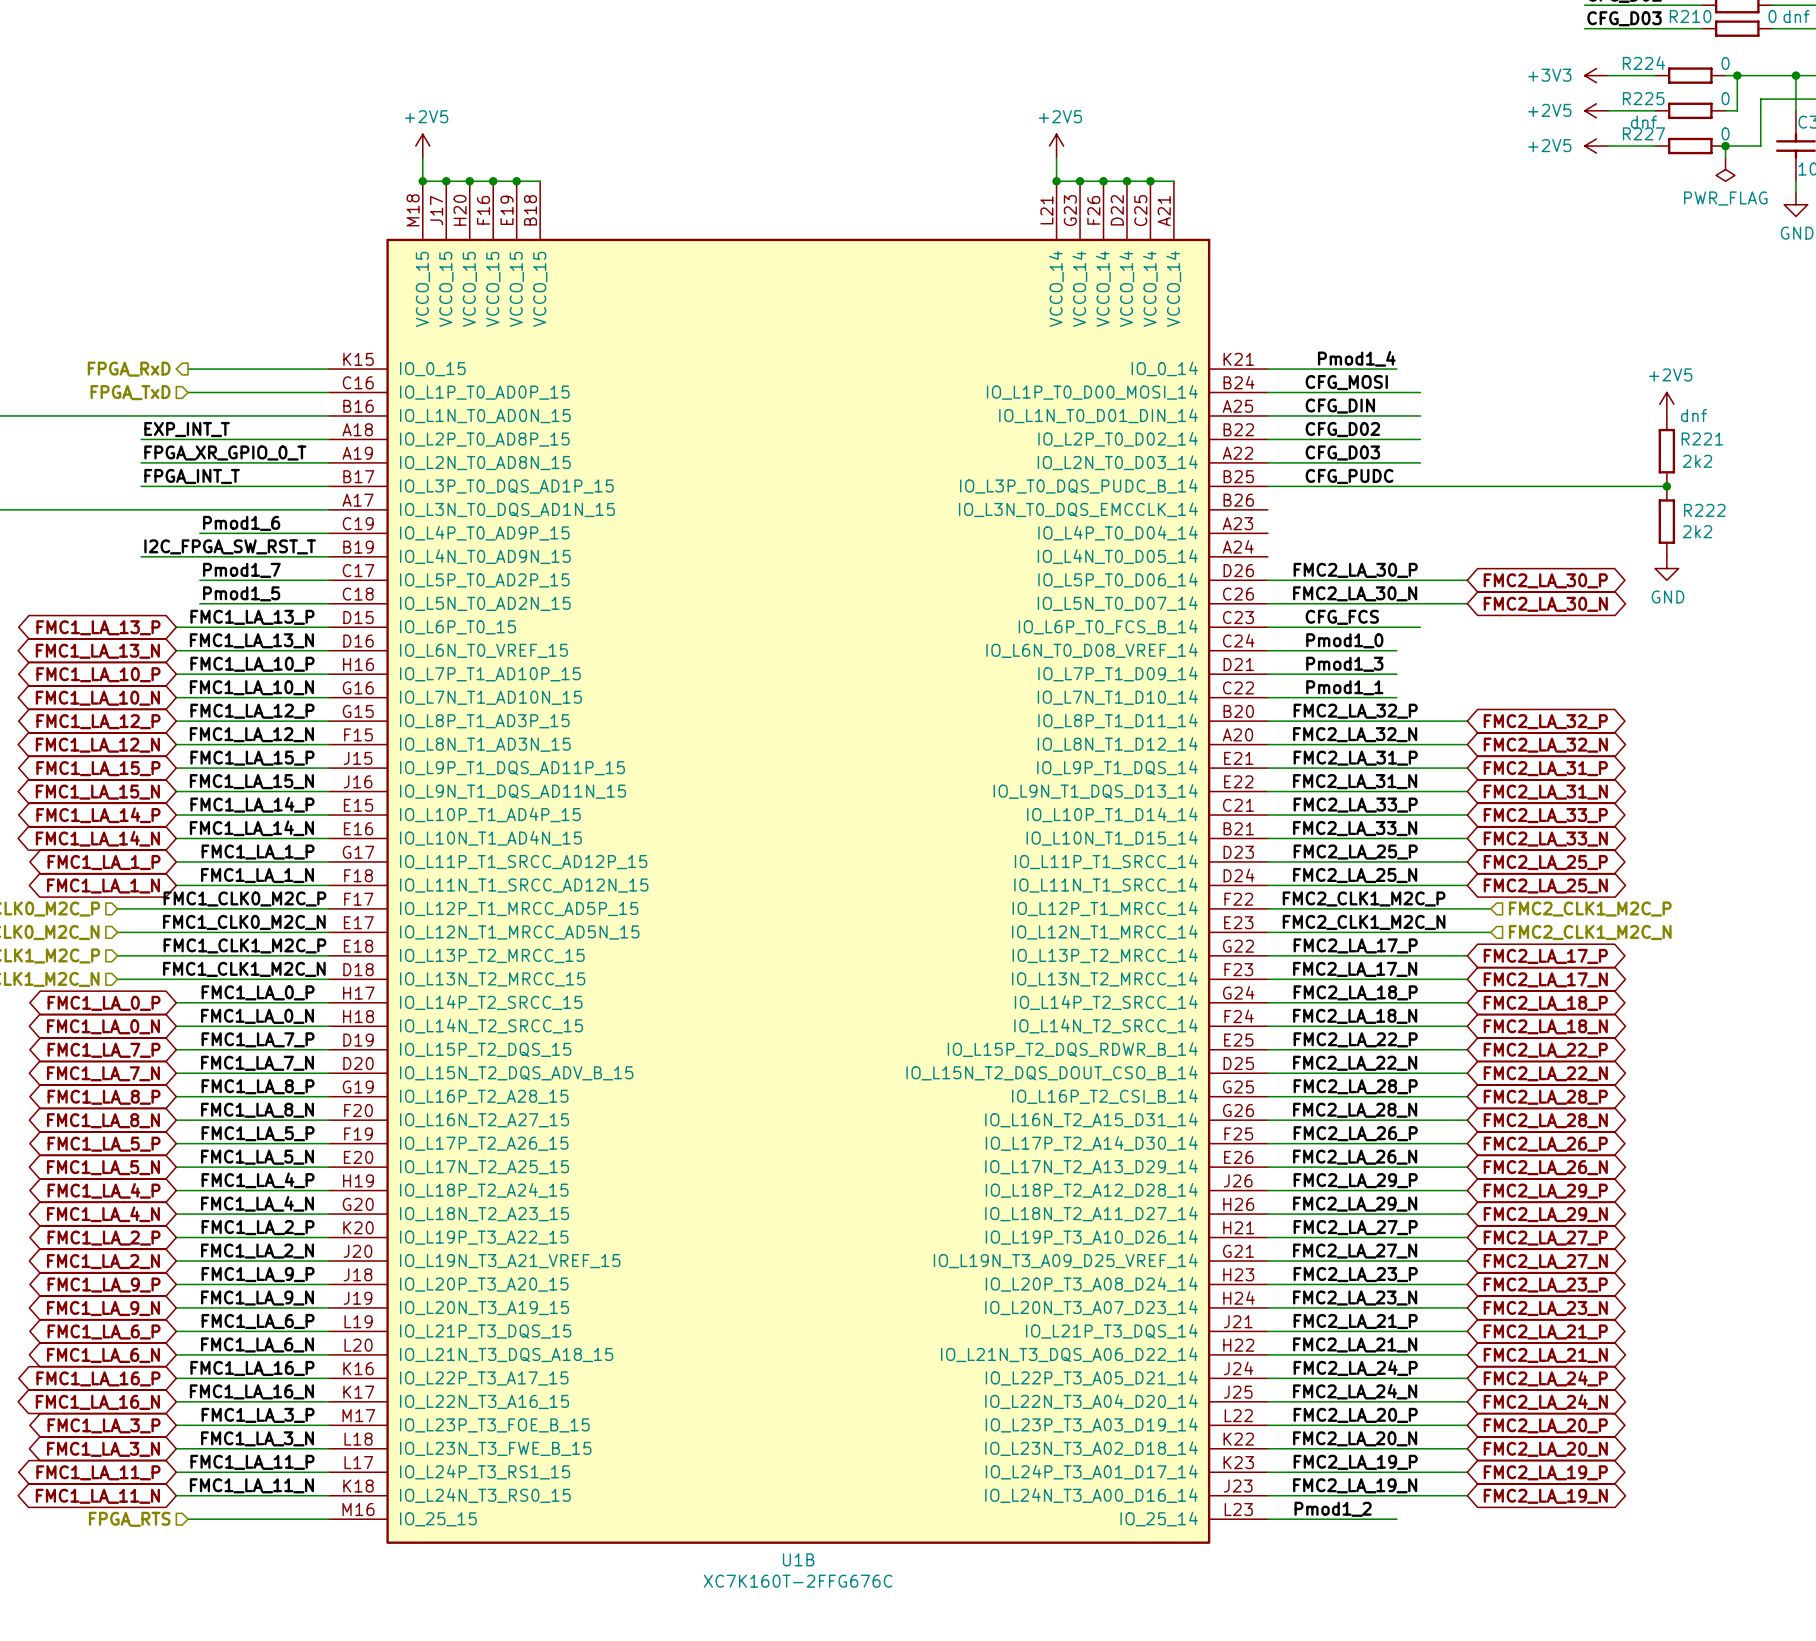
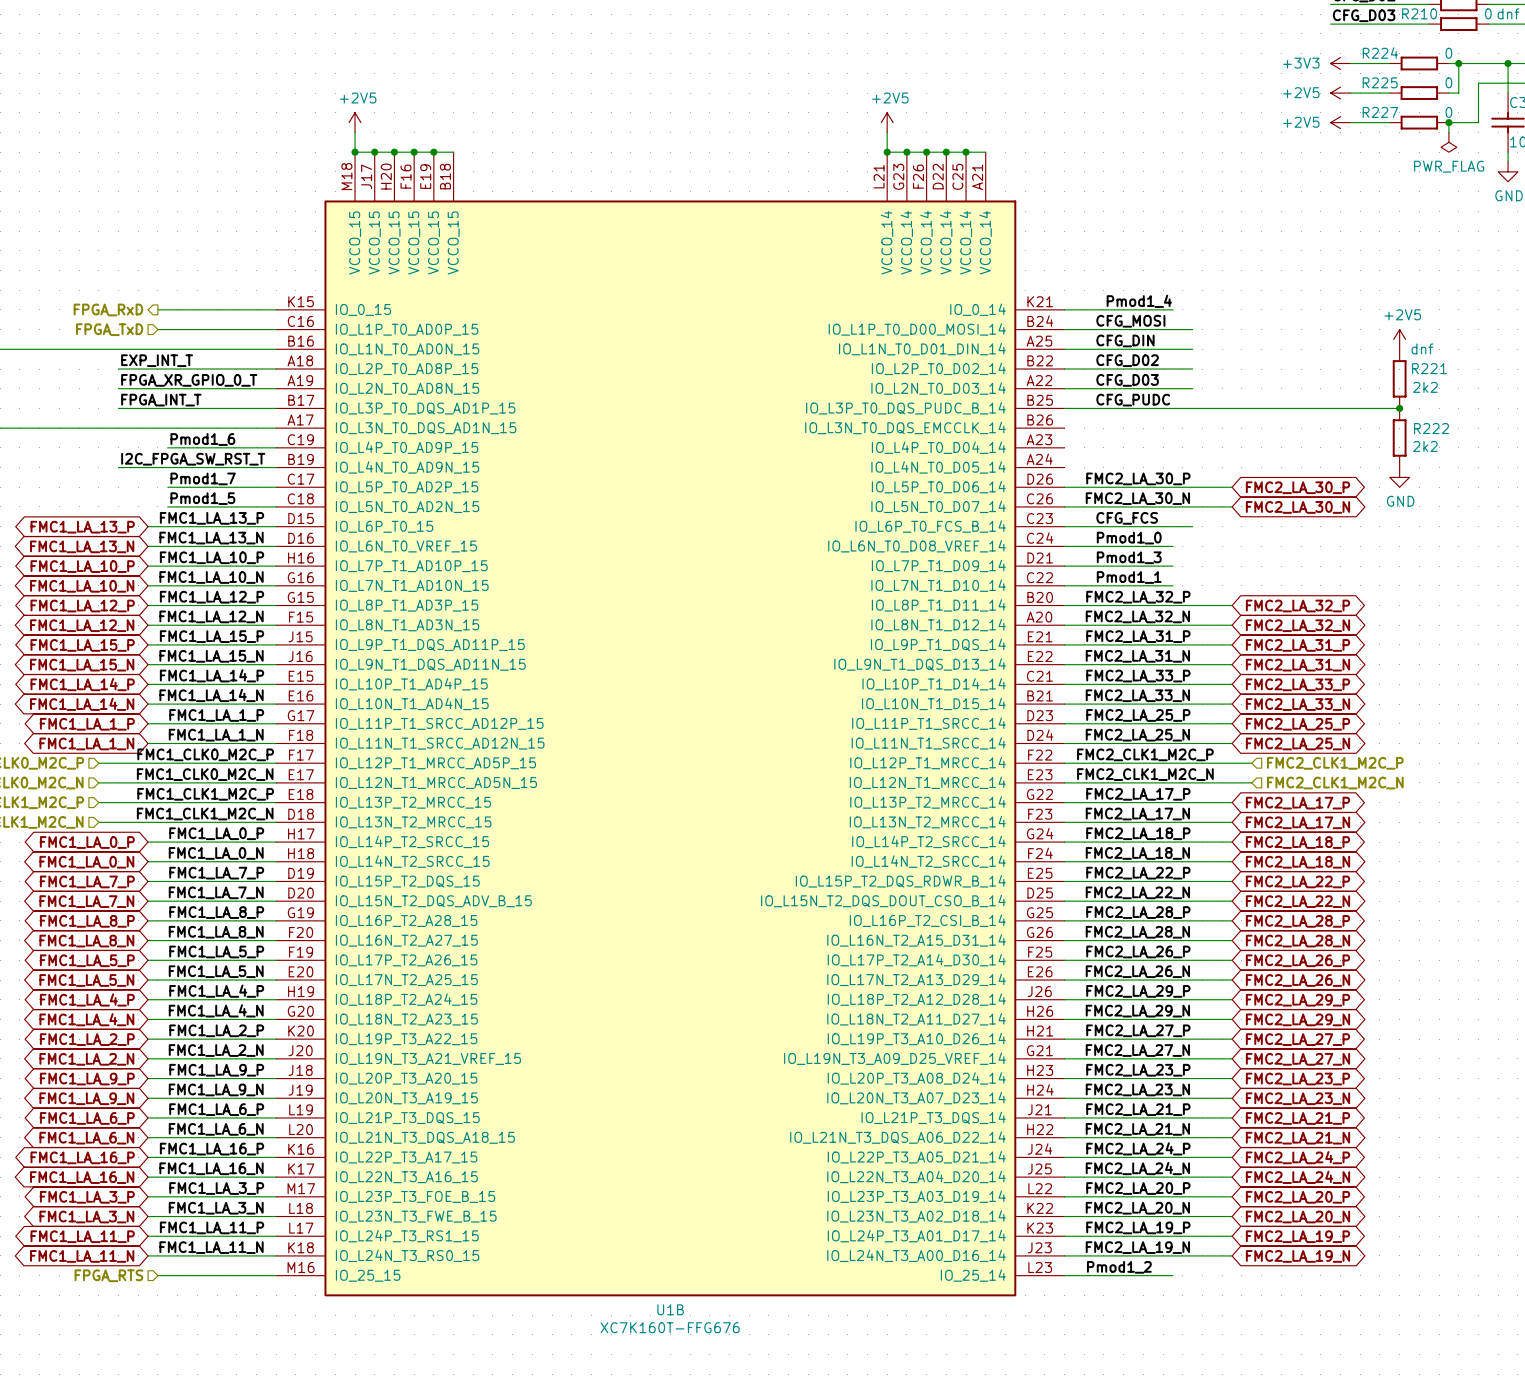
R225 text: dnf (1643, 122) -> none
U1B value: XC7K160T-2FFG676C (798, 1581) -> XC7K160T-FFG676 (670, 1327)

